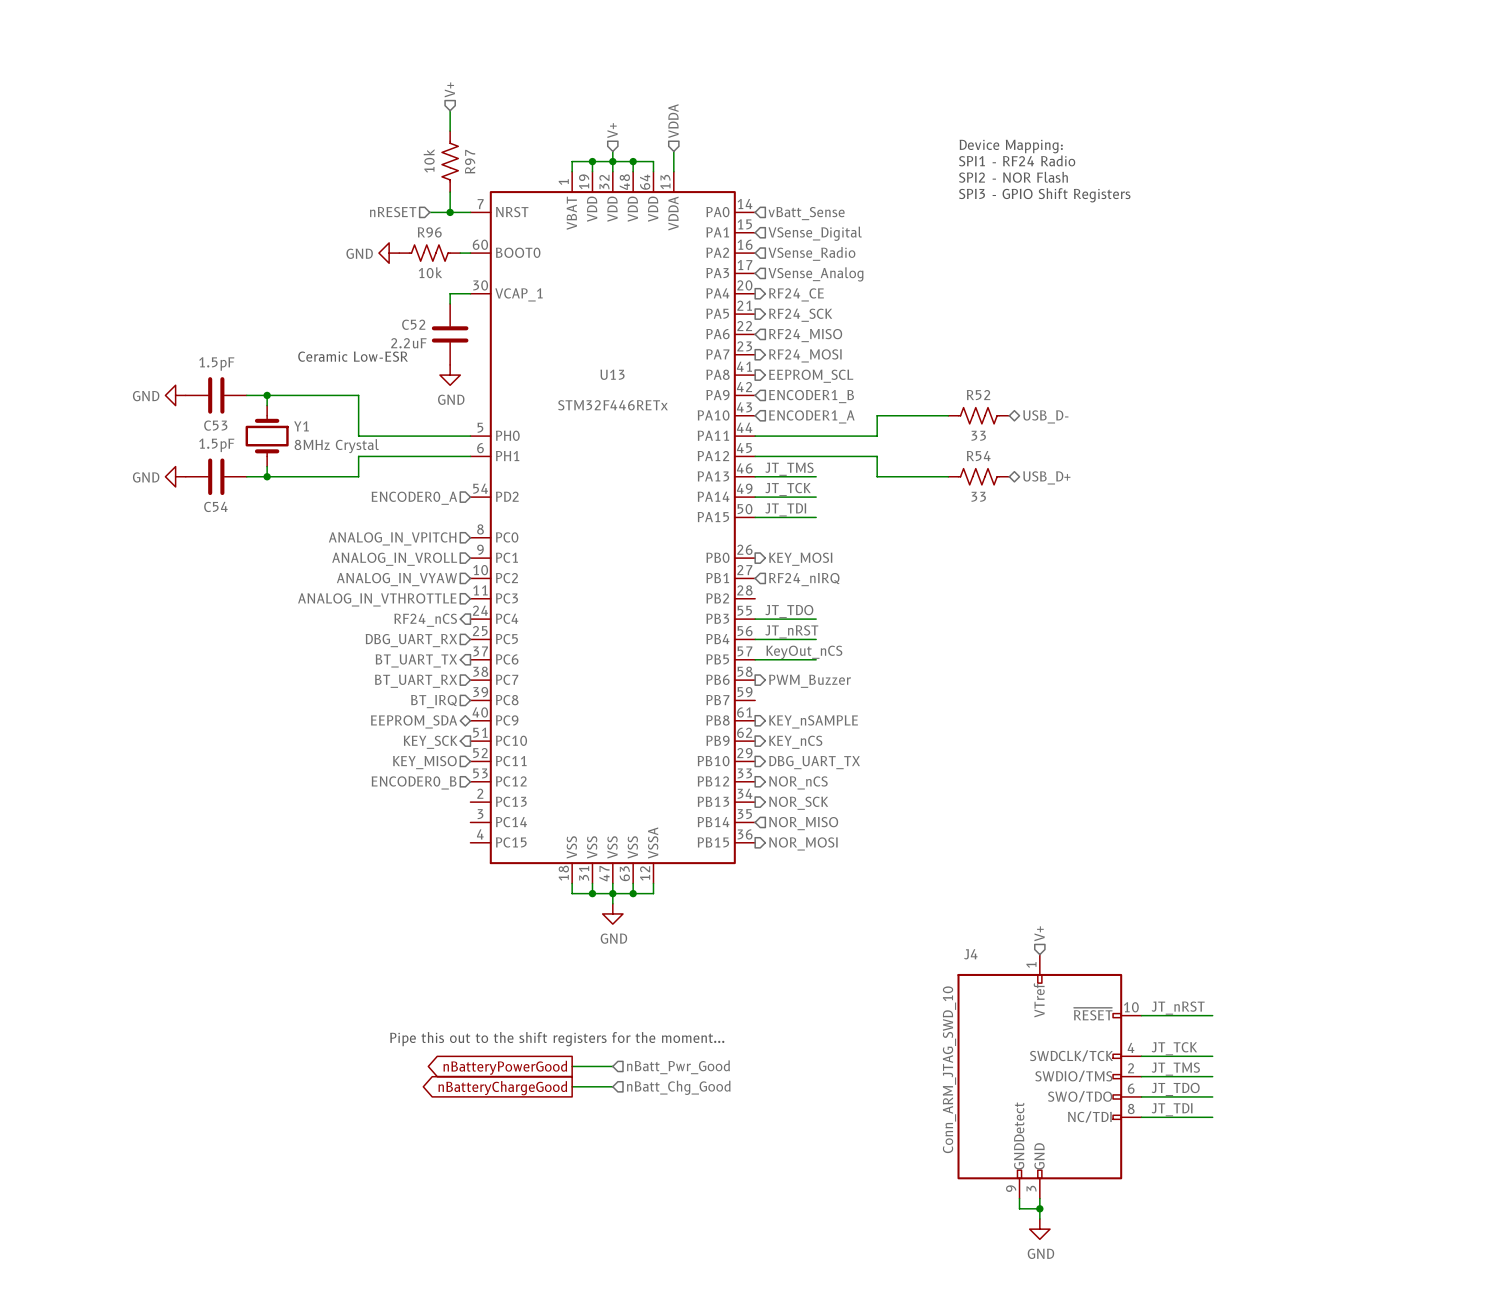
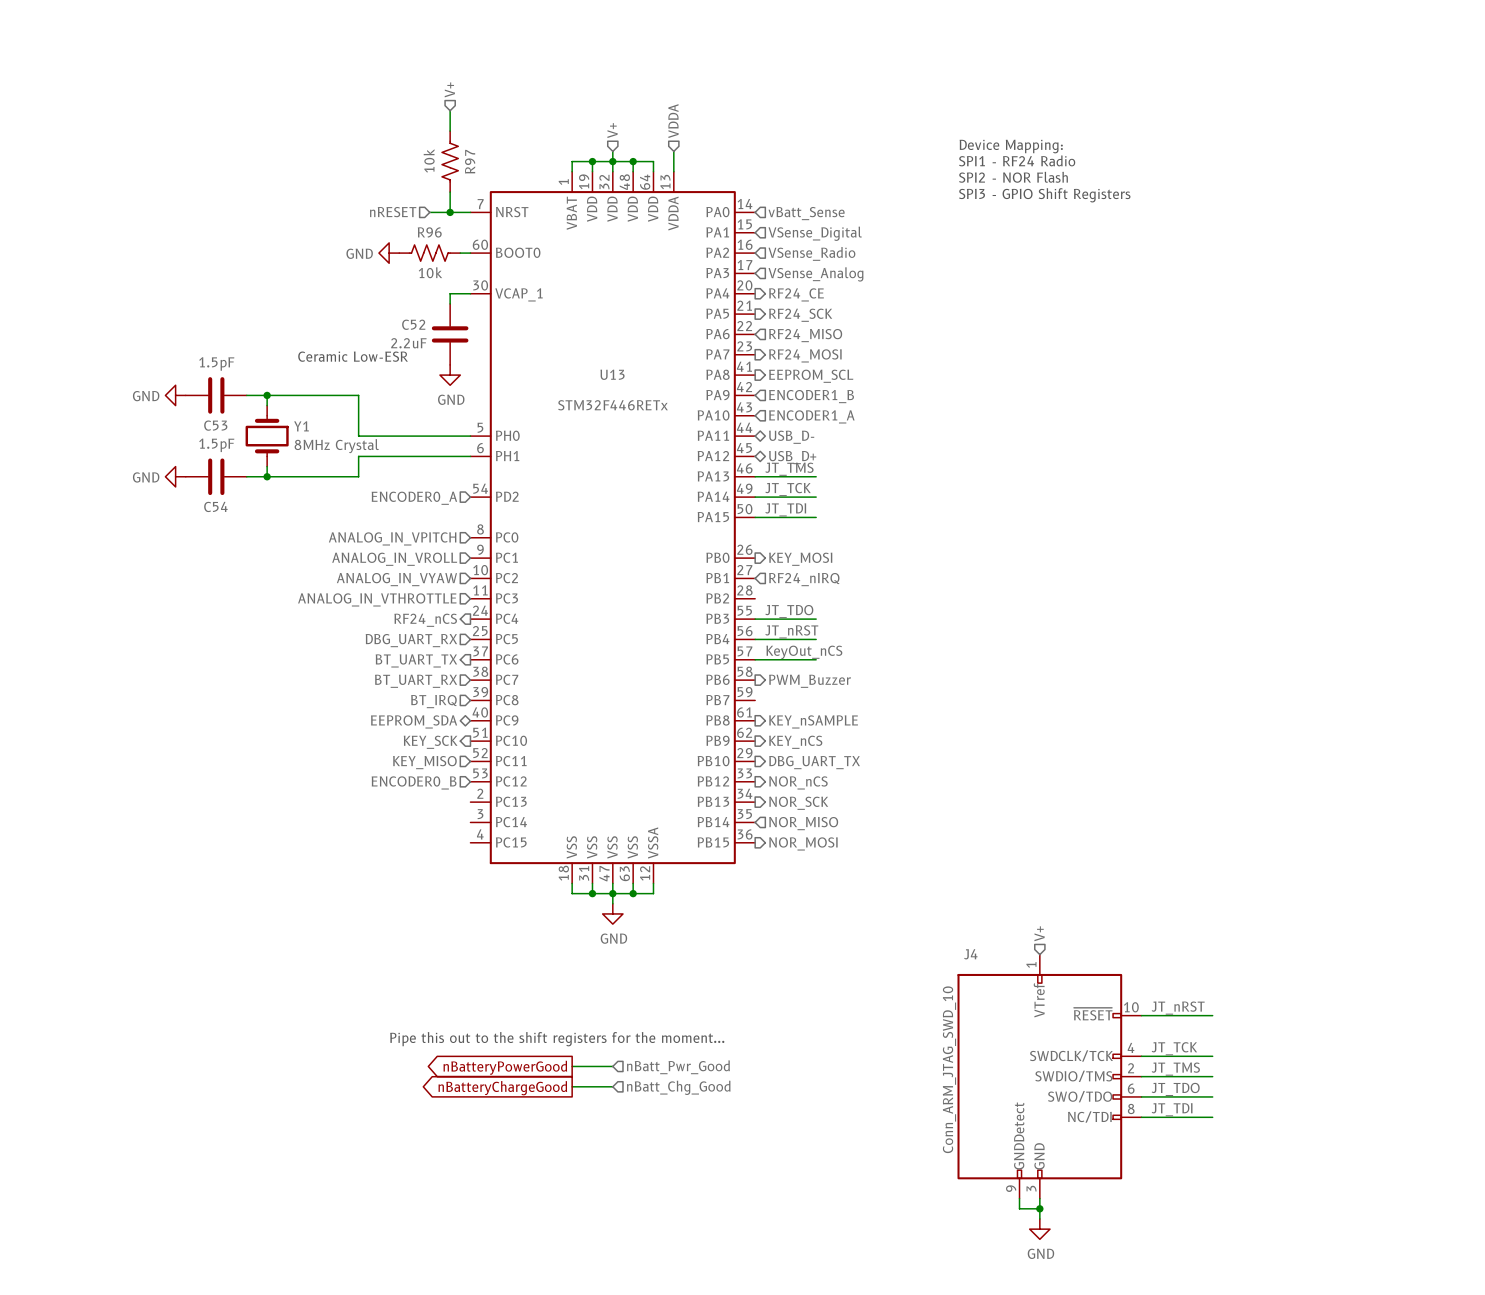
wire: (948, 415) (877, 415) (877, 436) (755, 436) -> none
R52: 33 (978, 415) -> none
hierarchical label: USB_D- (1045, 416) -> none
hierarchical label: none -> USB_D- (791, 437)
wire: (755, 456) (877, 456) (877, 476) (948, 476) -> none
hierarchical label: none -> USB_D+ (792, 457)
R54: 33 (978, 476) -> none
hierarchical label: USB_D+ (1046, 477) -> none

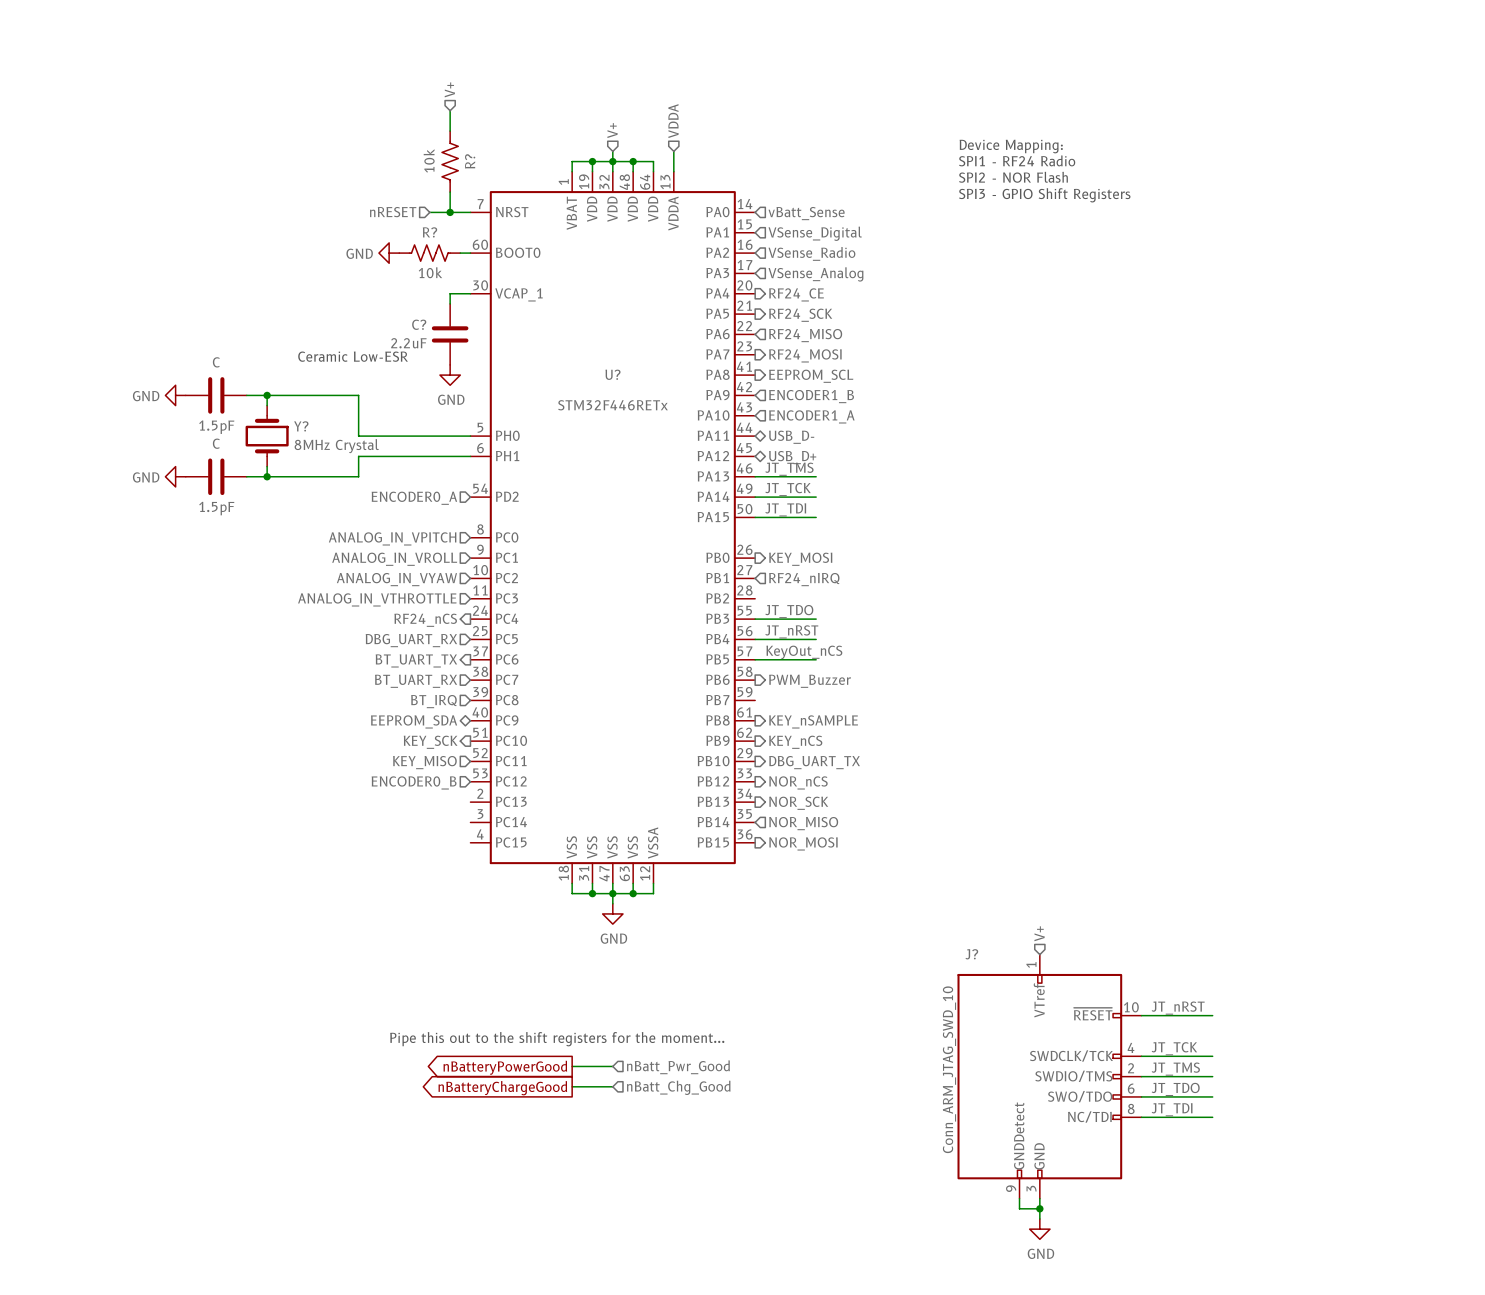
R97 name: R97 (470, 161) -> R? (470, 161)
R96 name: R96 (429, 232) -> R? (429, 232)
C52 name: C52 (413, 324) -> C? (419, 324)
C53 value: 1.5pF (216, 363) -> C (216, 362)
U13 name: U13 (612, 374) -> U? (612, 374)
C53 name: C53 (215, 425) -> 1.5pF (216, 427)
Y1 name: Y1 (301, 426) -> Y? (301, 426)
C54 value: 1.5pF (216, 445) -> C (216, 443)
C54 name: C54 (215, 506) -> 1.5pF (216, 508)
J4 name: J4 (970, 954) -> J? (971, 954)

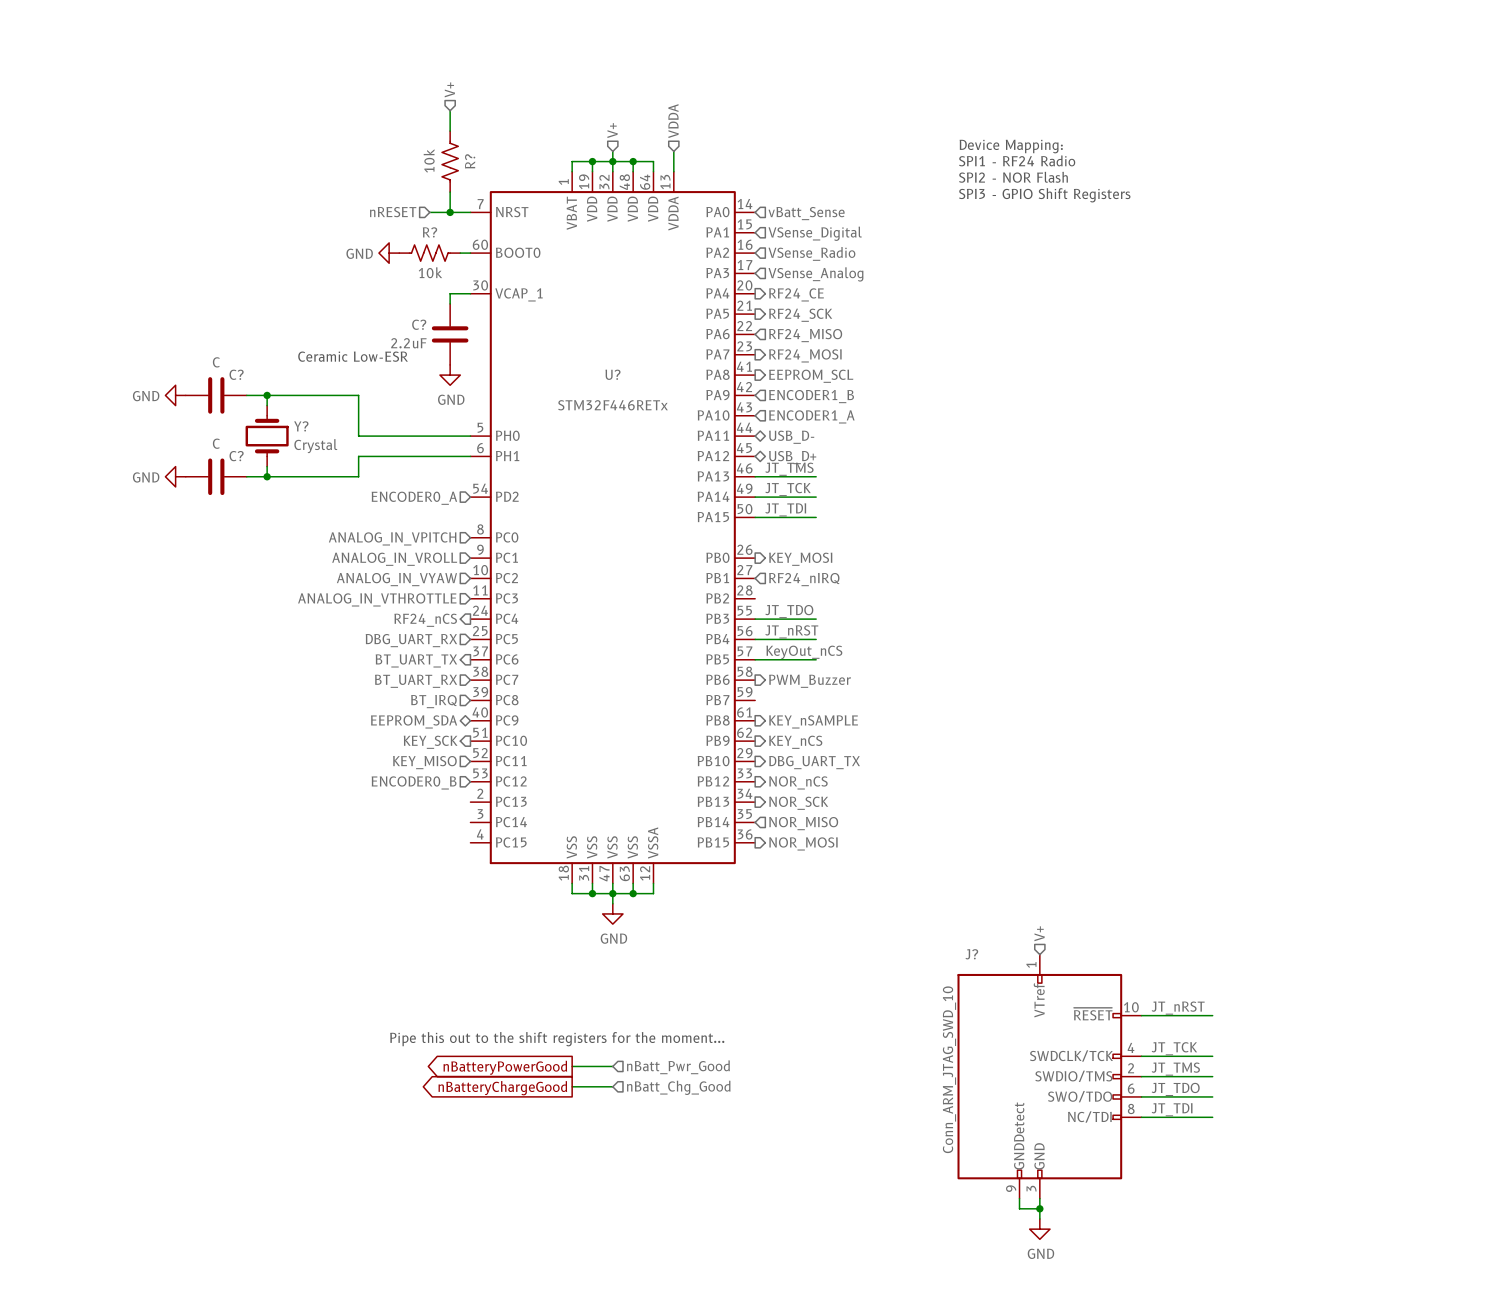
1.5pF name: 1.5pF (216, 427) -> C? (236, 374)
Y? value: 8MHz Crystal (336, 446) -> Crystal (315, 446)
1.5pF name: 1.5pF (216, 508) -> C? (236, 456)

